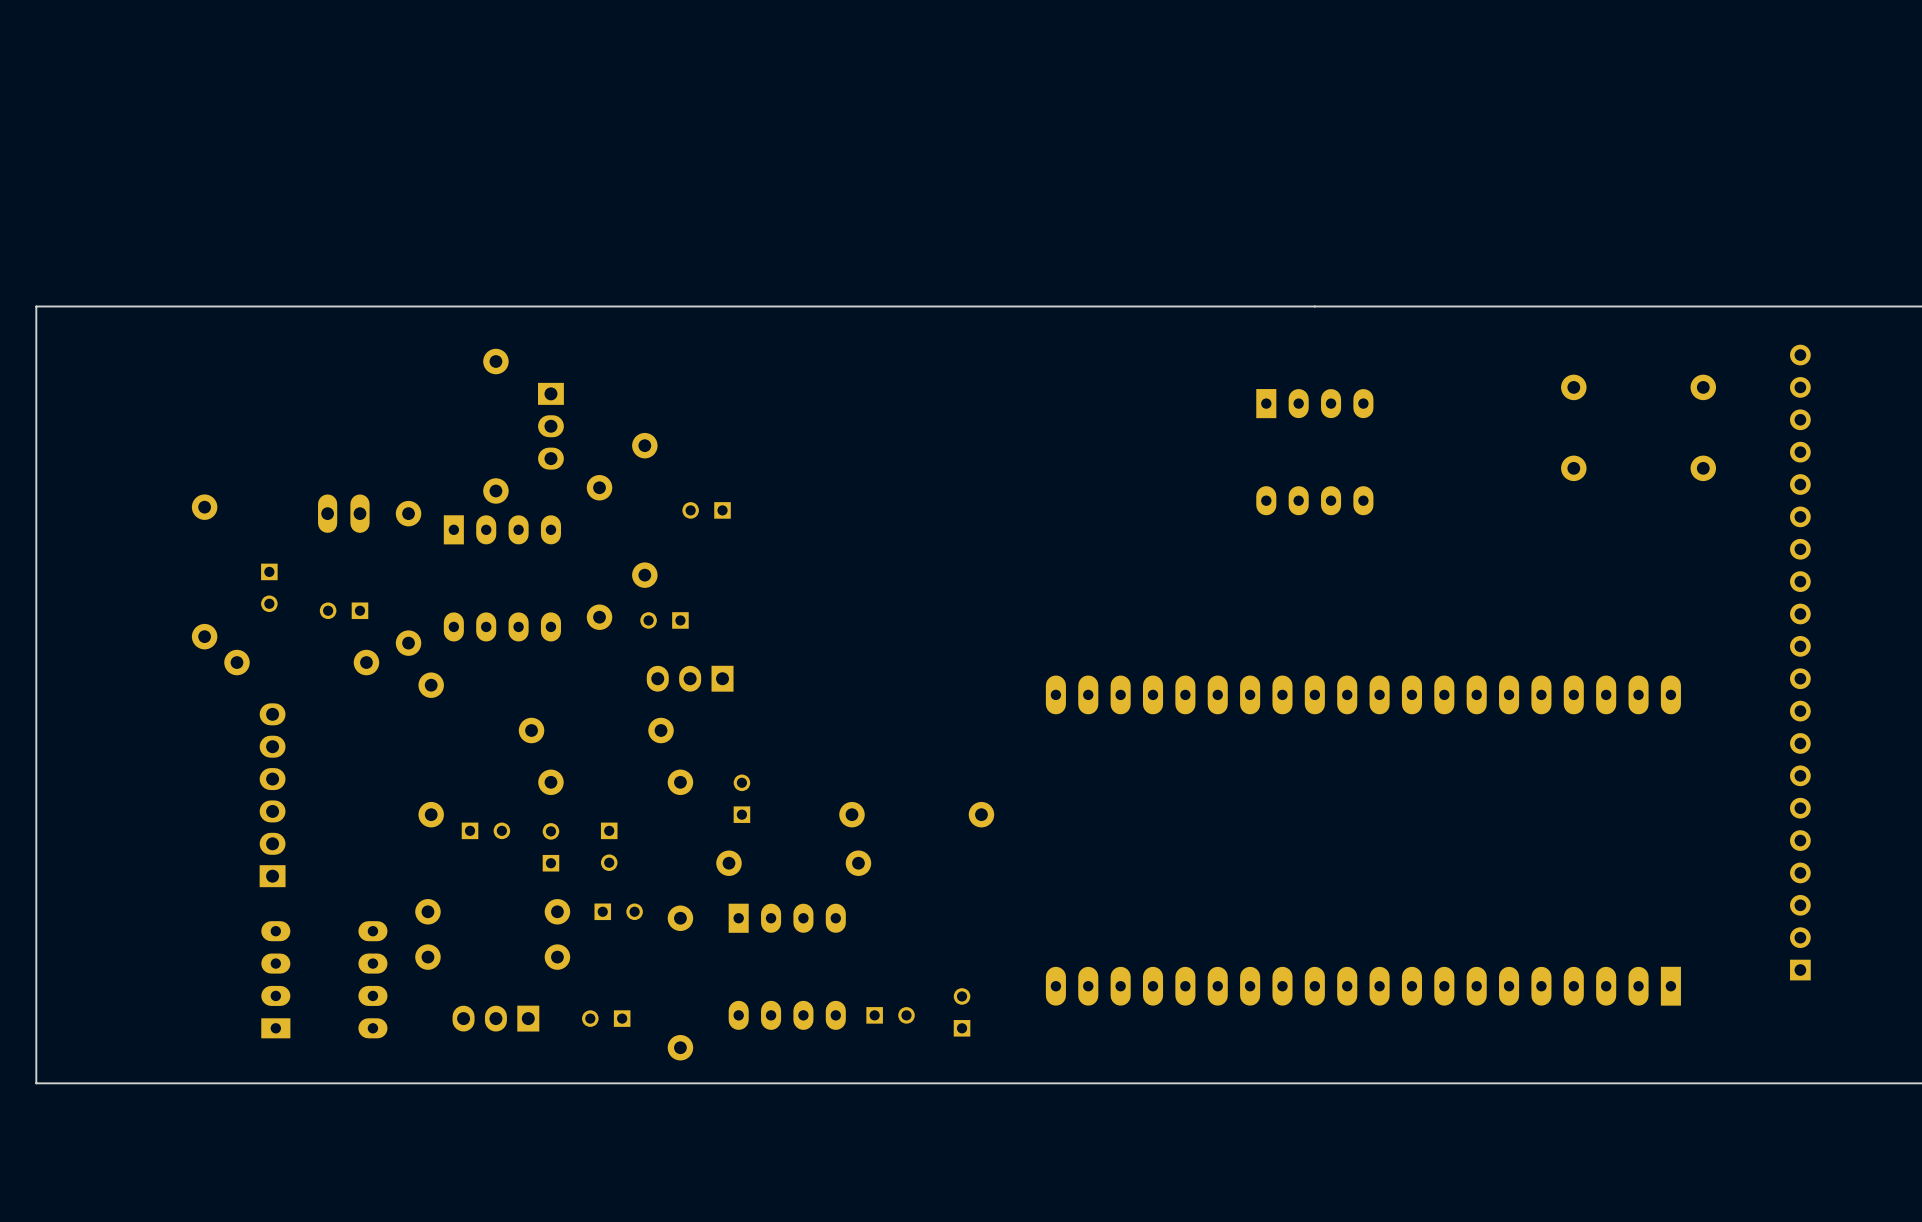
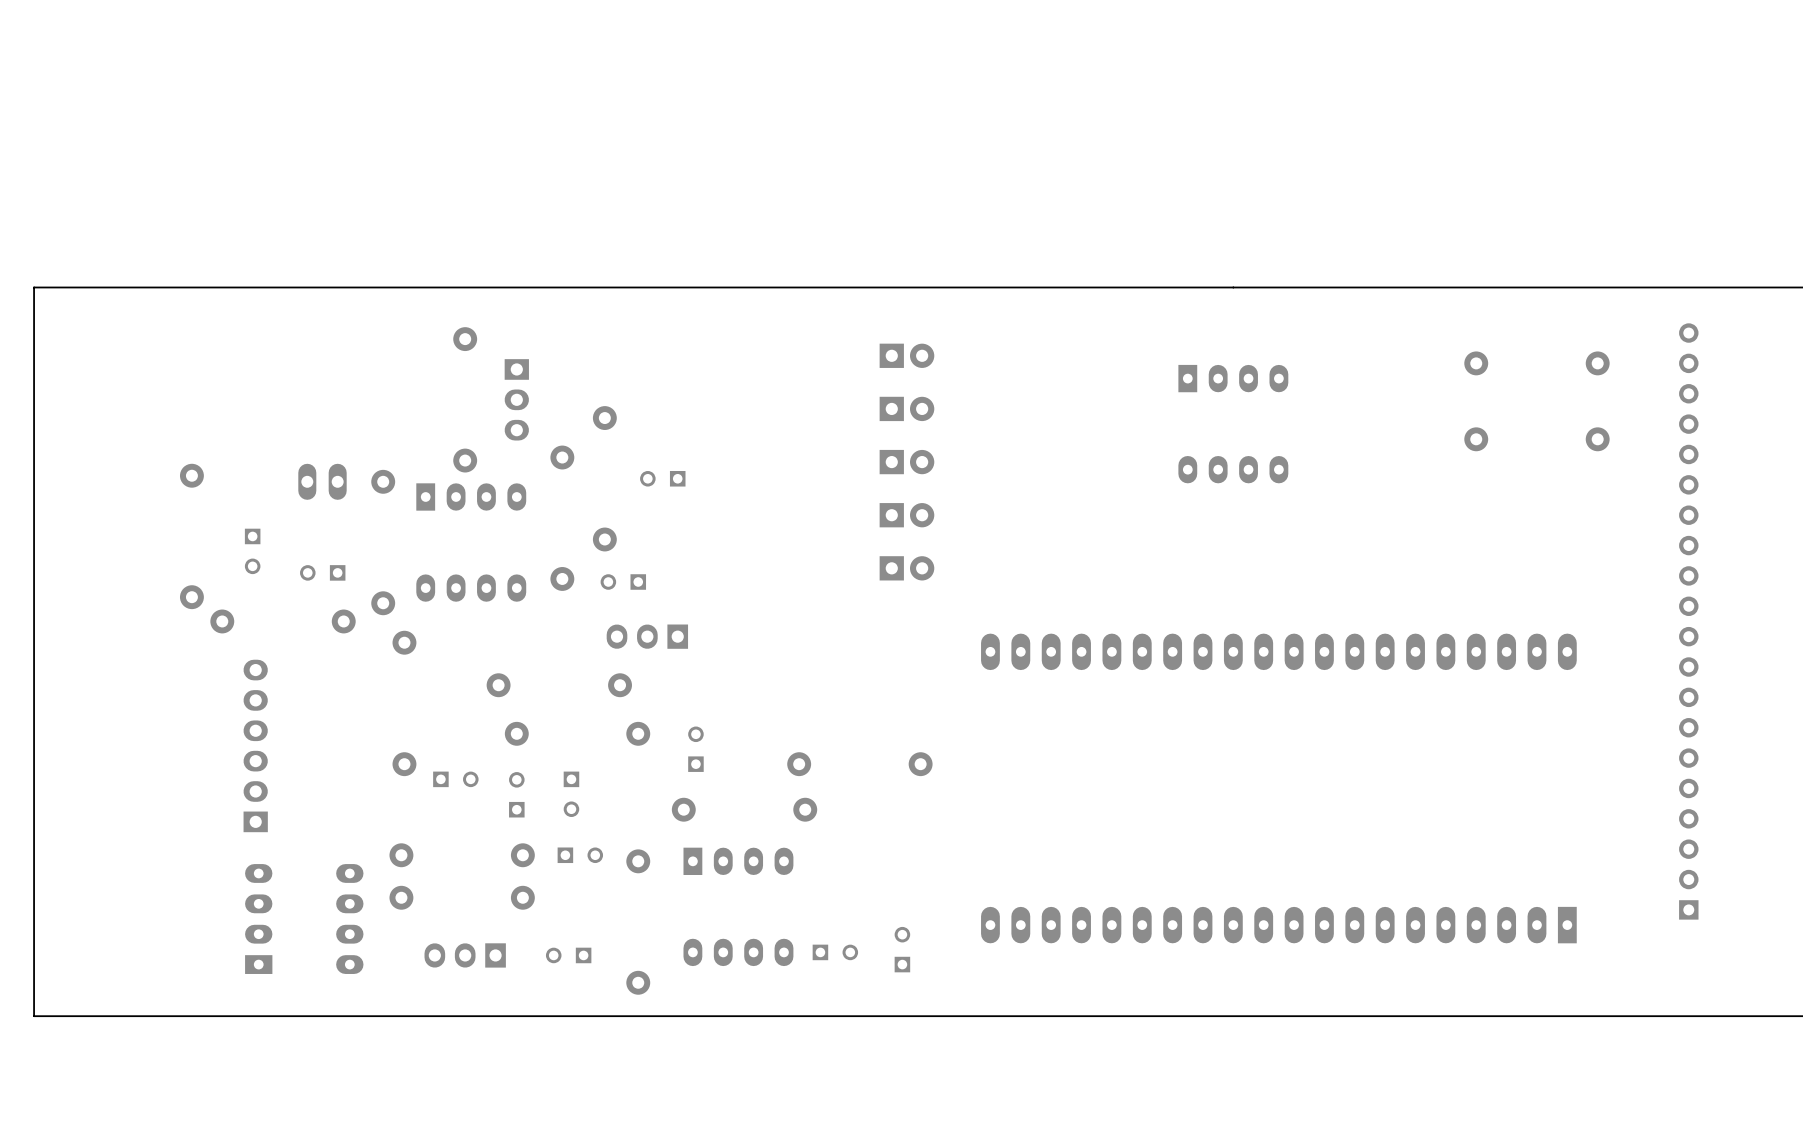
part: none -> (906, 355)
part: none -> (906, 408)
part: none -> (906, 462)
part: none -> (906, 515)
part: none -> (906, 568)

